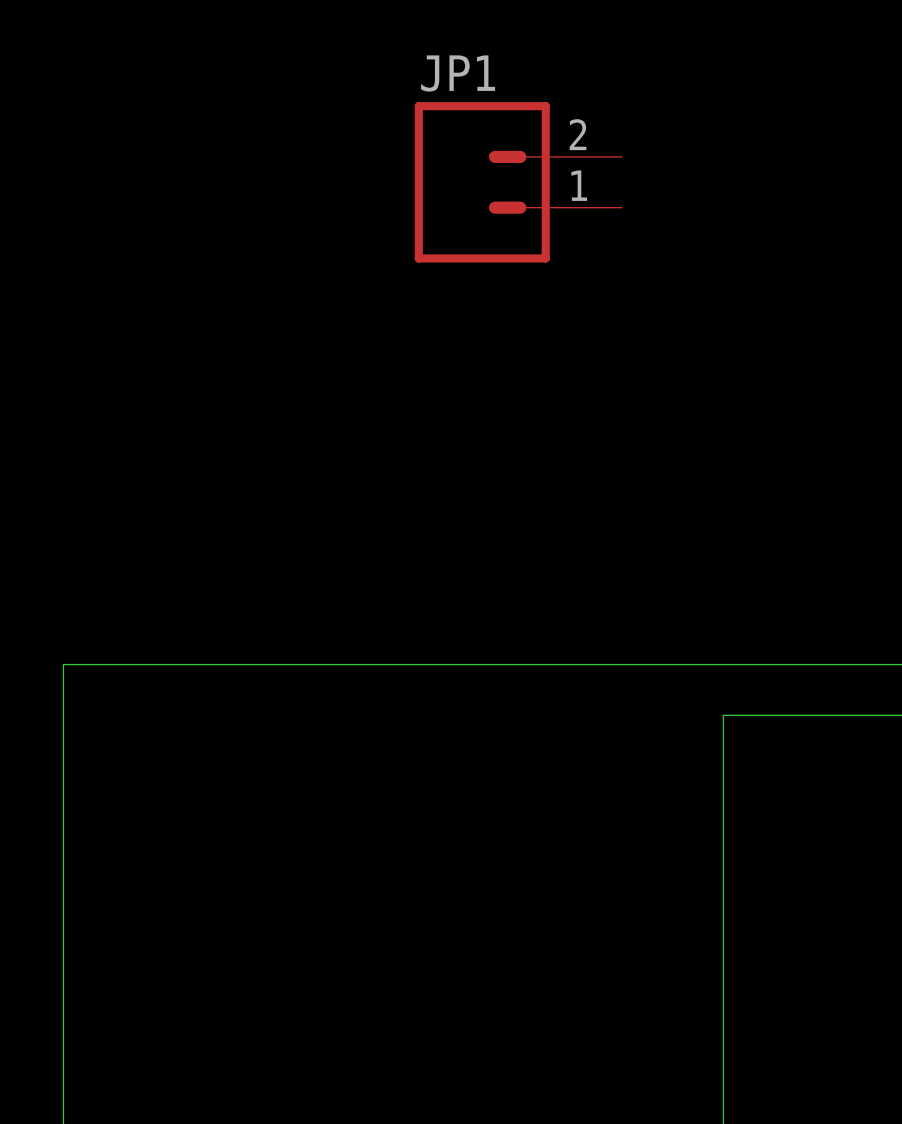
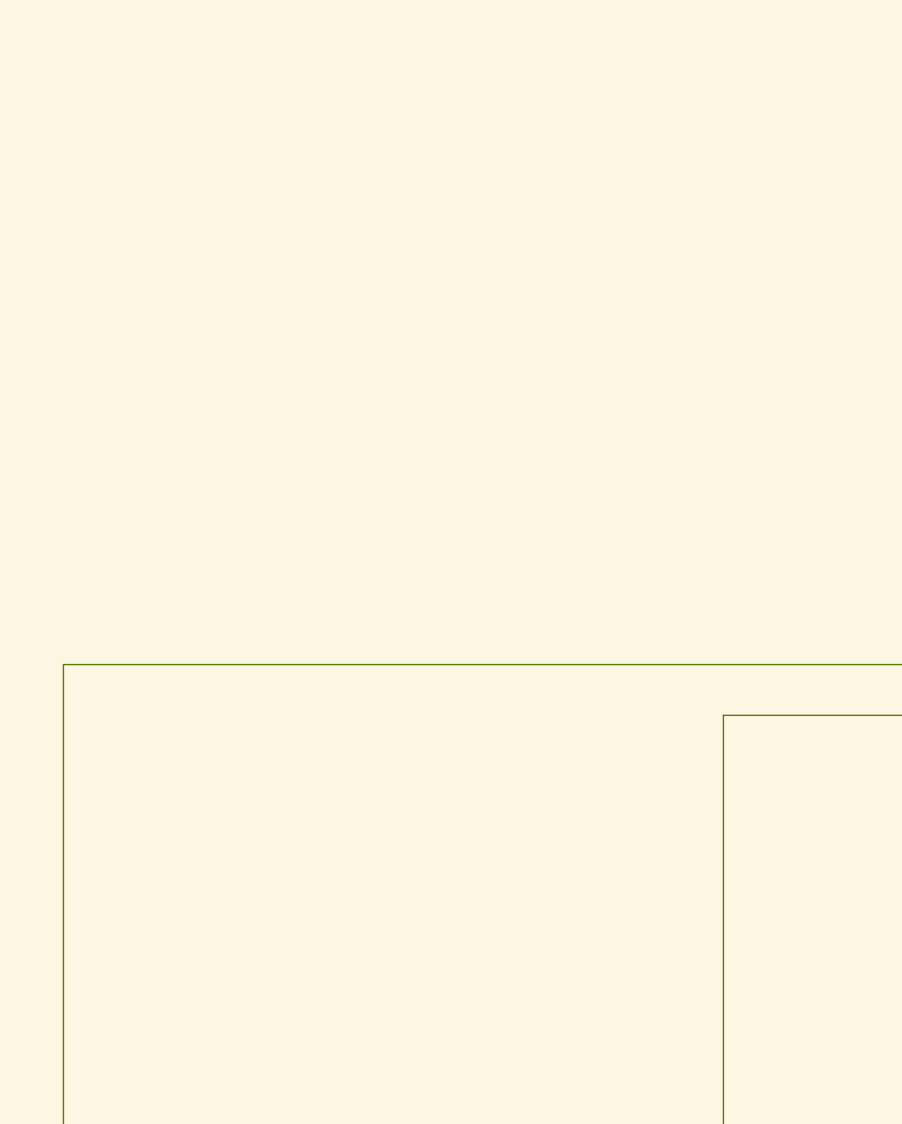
JP1: (518, 182) -> none

